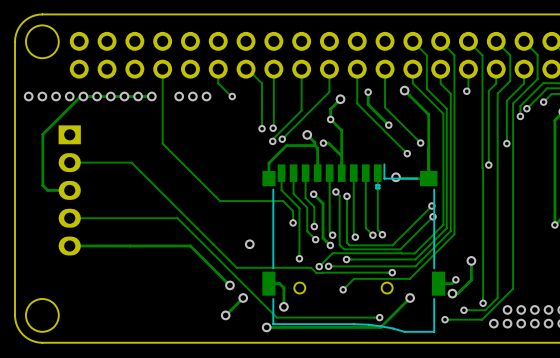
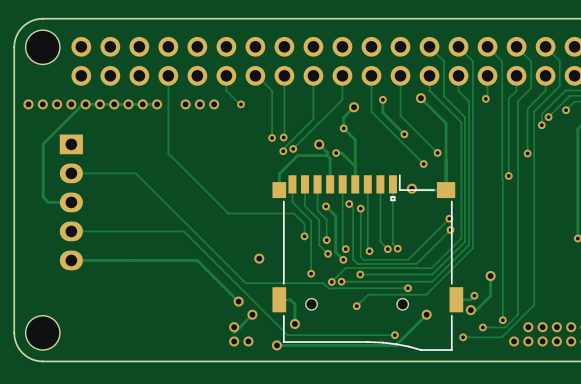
via: none -> (234, 327)
via: (225, 315) -> none
via: none -> (234, 341)
via: none -> (248, 341)

